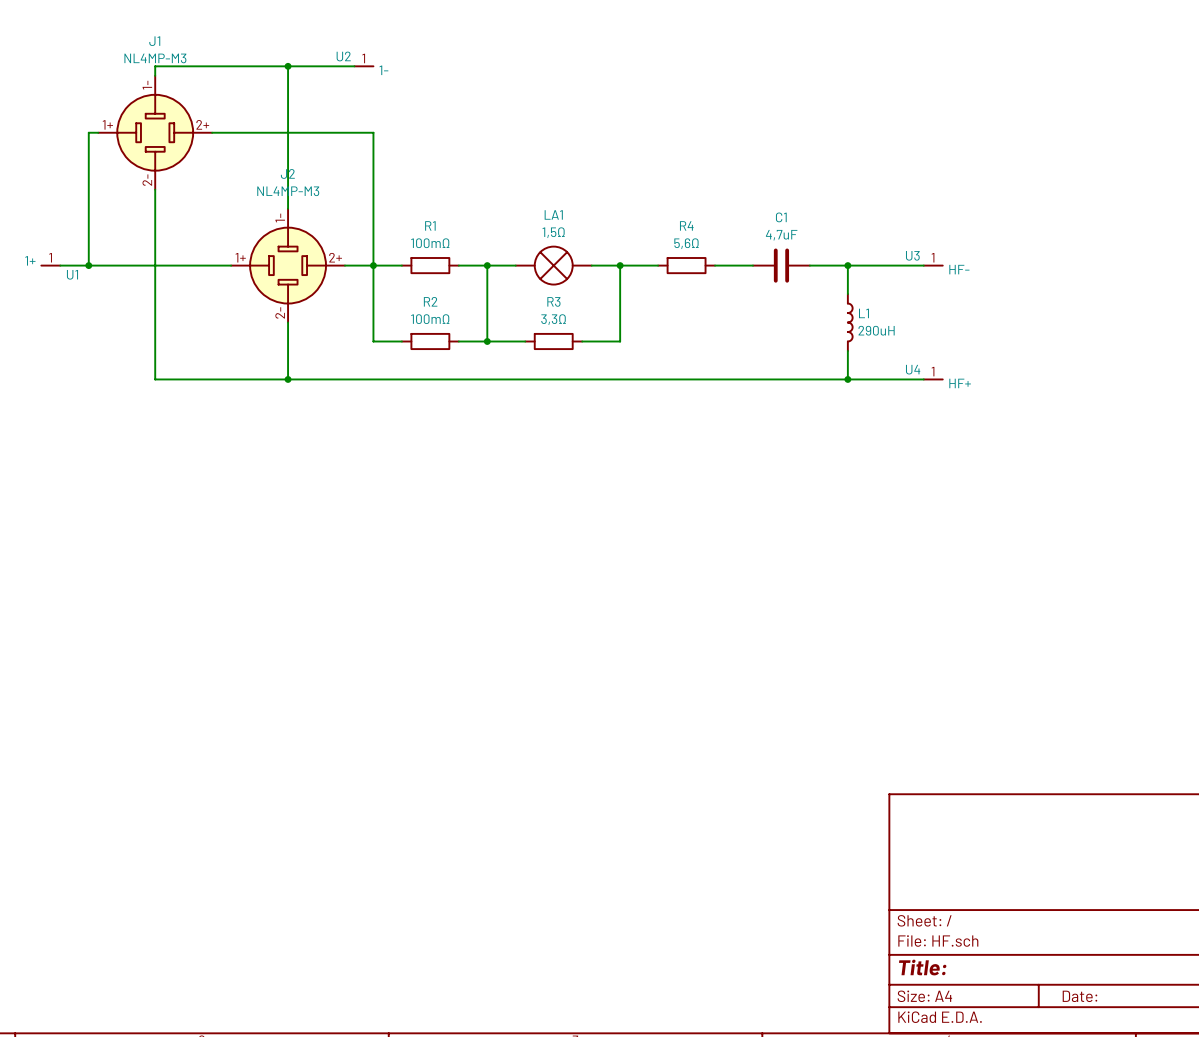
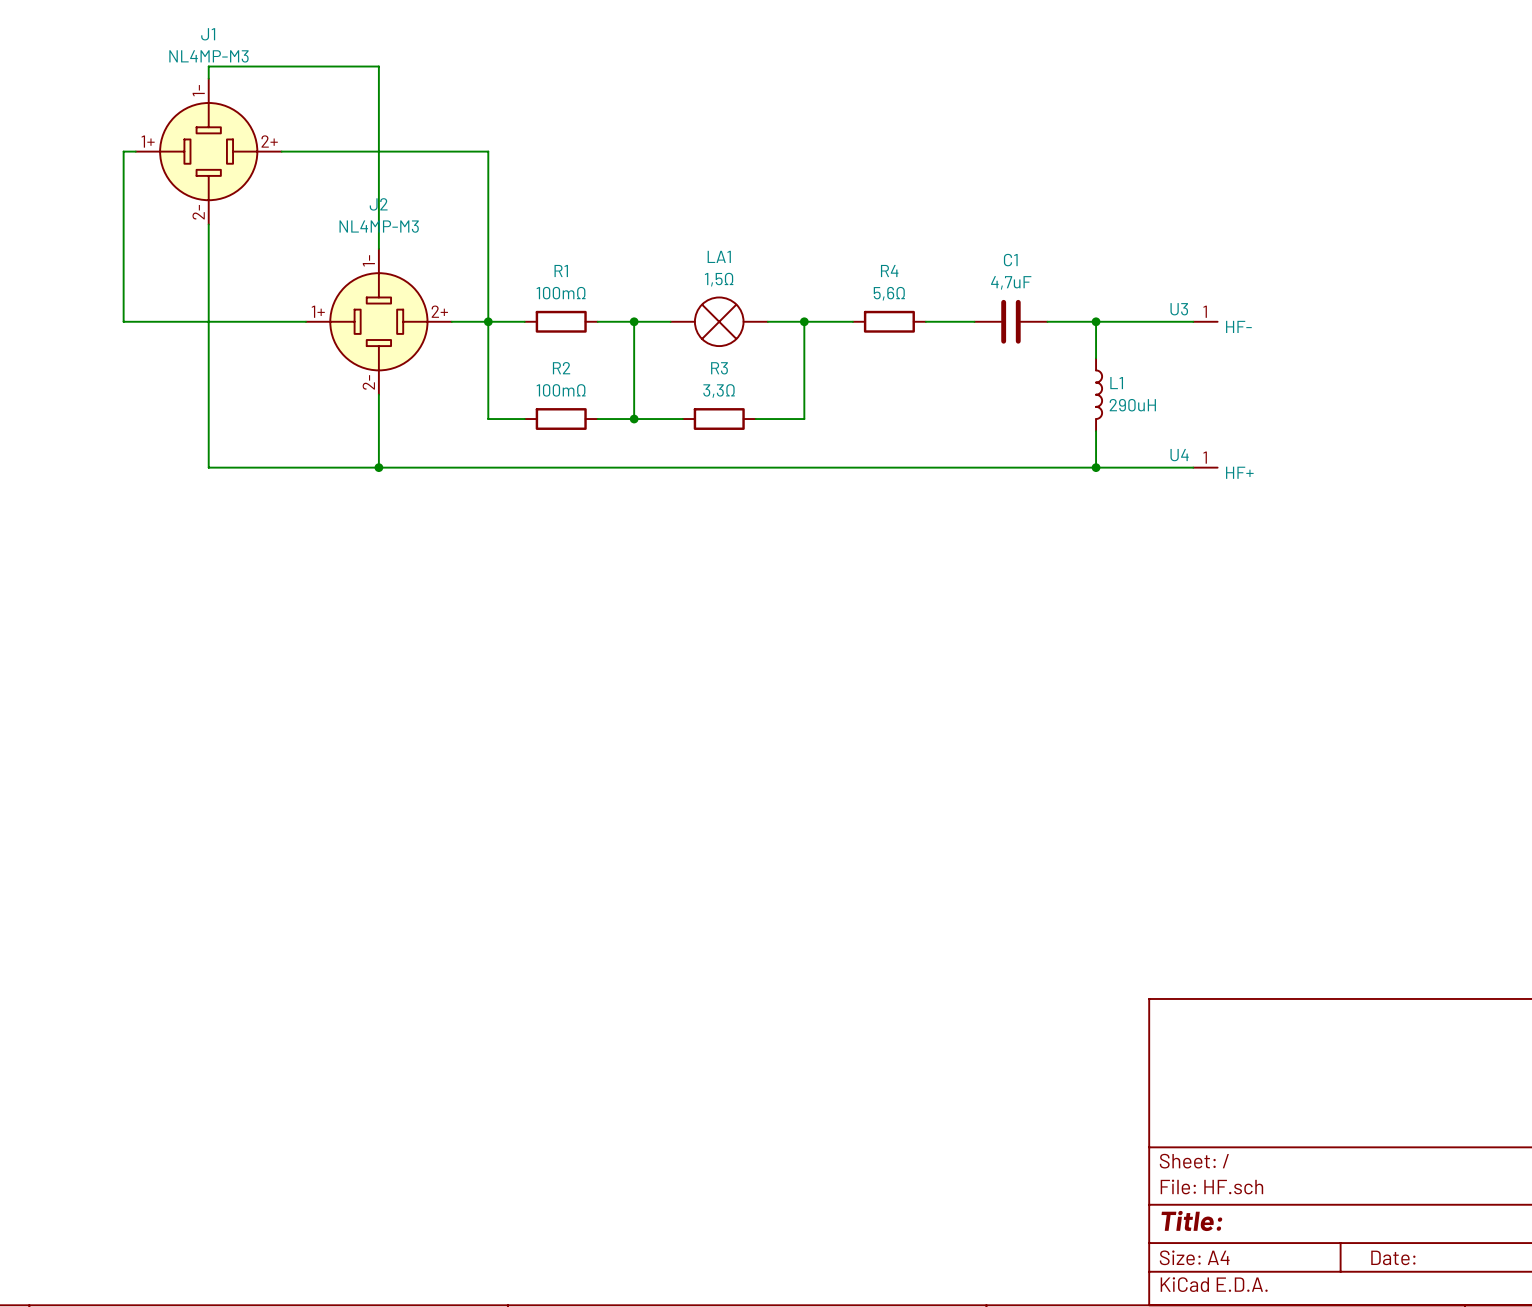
wire: (288, 66) (354, 66) -> none
junction: (288, 66) -> none
U2: 1- (363, 66) -> none
U1: 1+ (50, 265) -> none
wire: (60, 265) (88, 265) -> none
junction: (88, 265) -> none

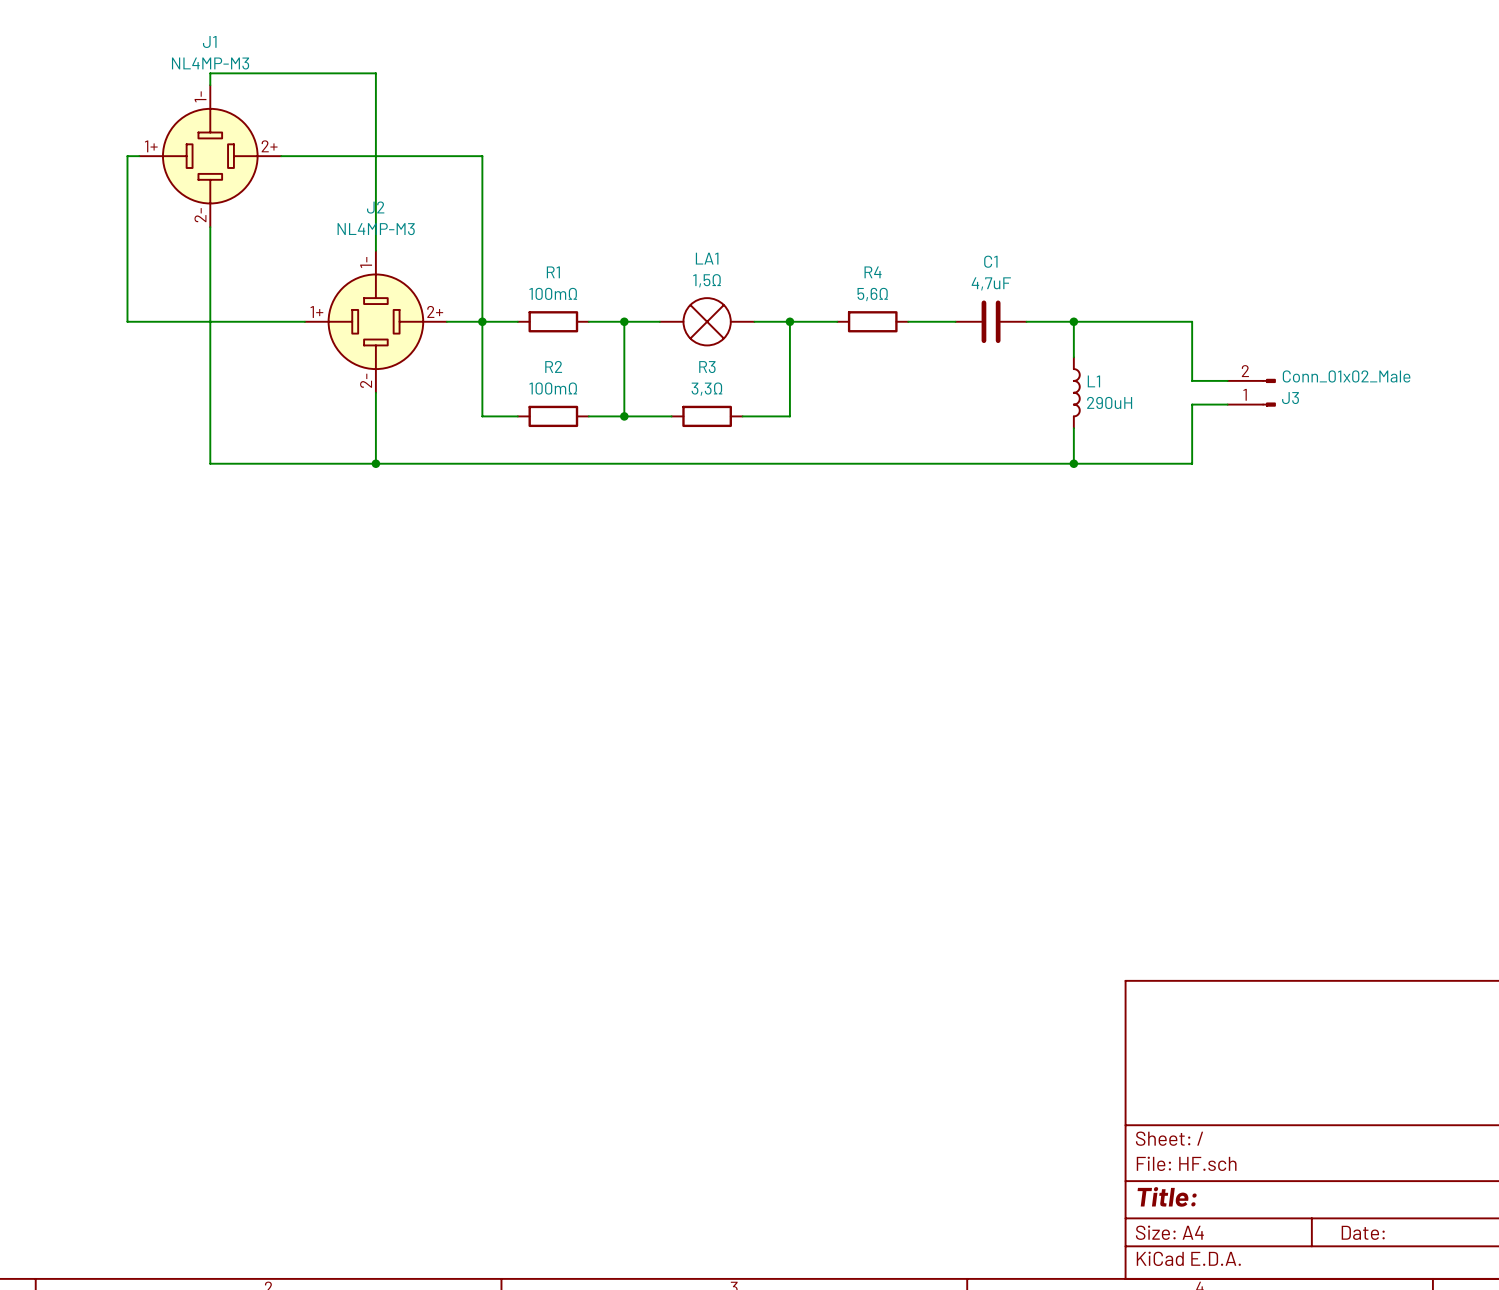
wire: none -> (1168, 321) (1192, 321) (1192, 380) (1227, 380)
U3: HF- (1205, 321) -> none
J3: none -> Conn_01x02_Male (1251, 392)
wire: none -> (1227, 404) (1192, 404) (1192, 463) (1168, 463)
U4: HF+ (1205, 467) -> none

